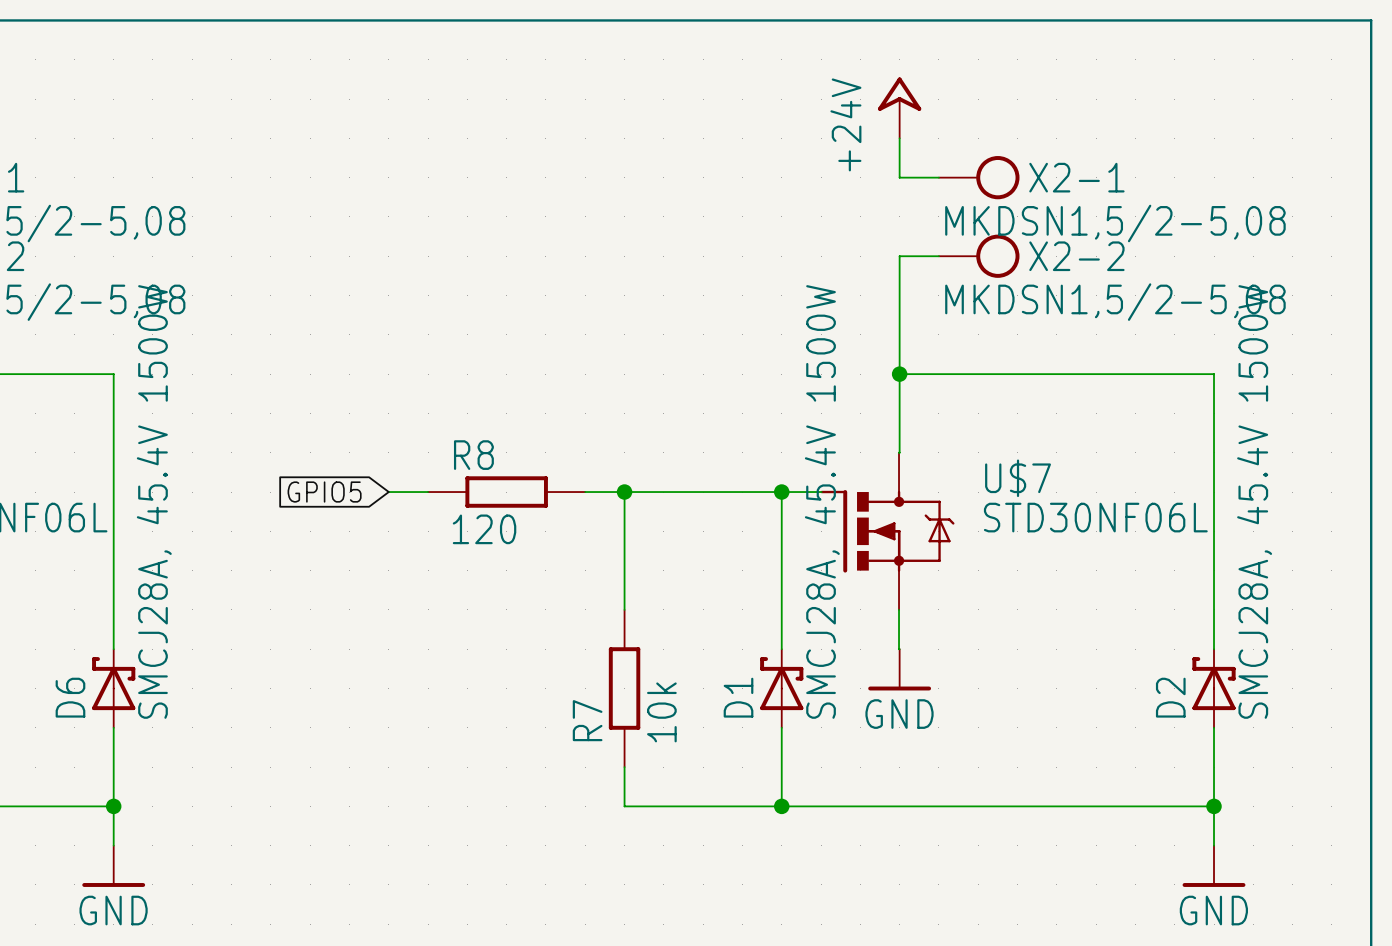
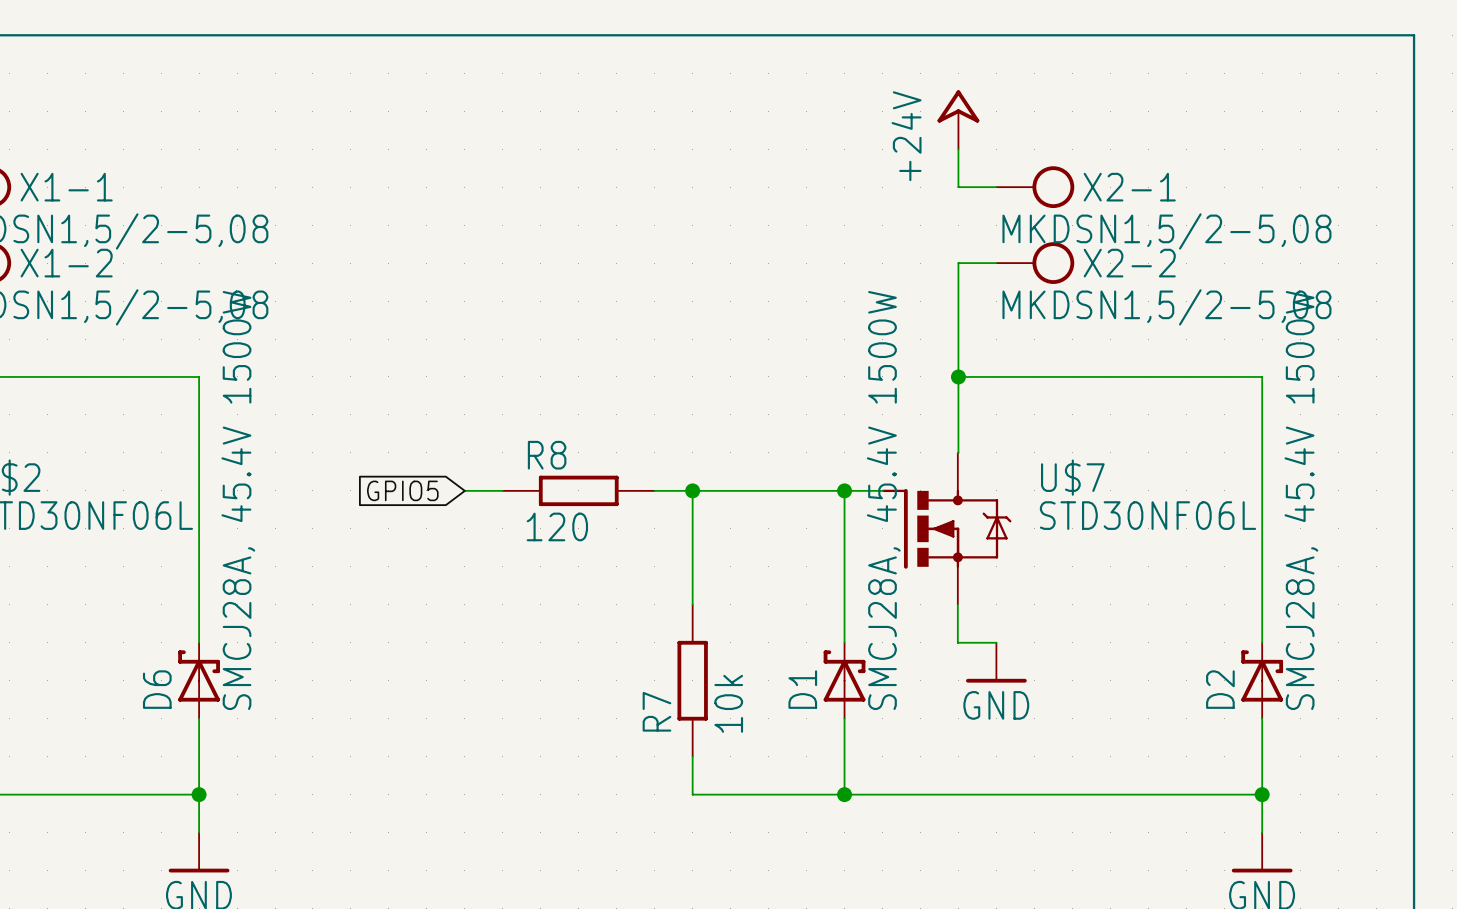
wire: none -> (958, 642) (996, 642)
power symbol position: GND (899, 669) -> GND (996, 662)

